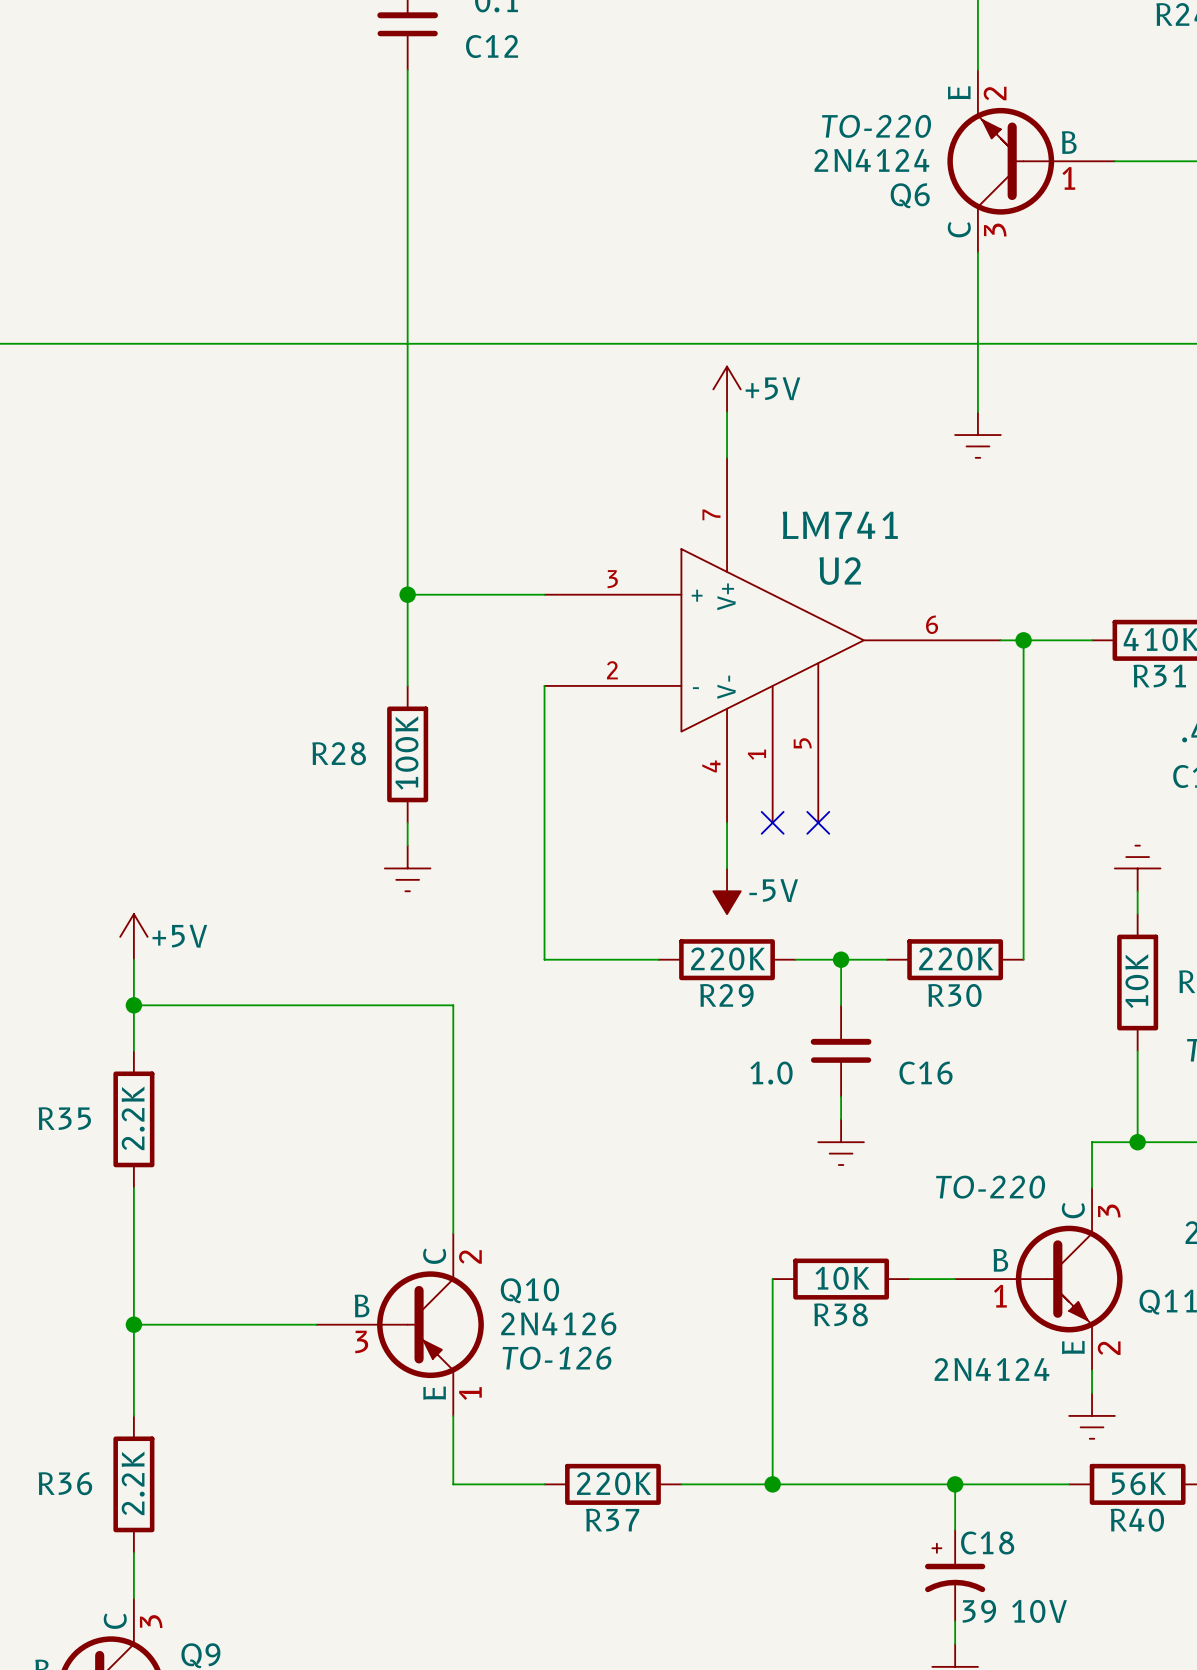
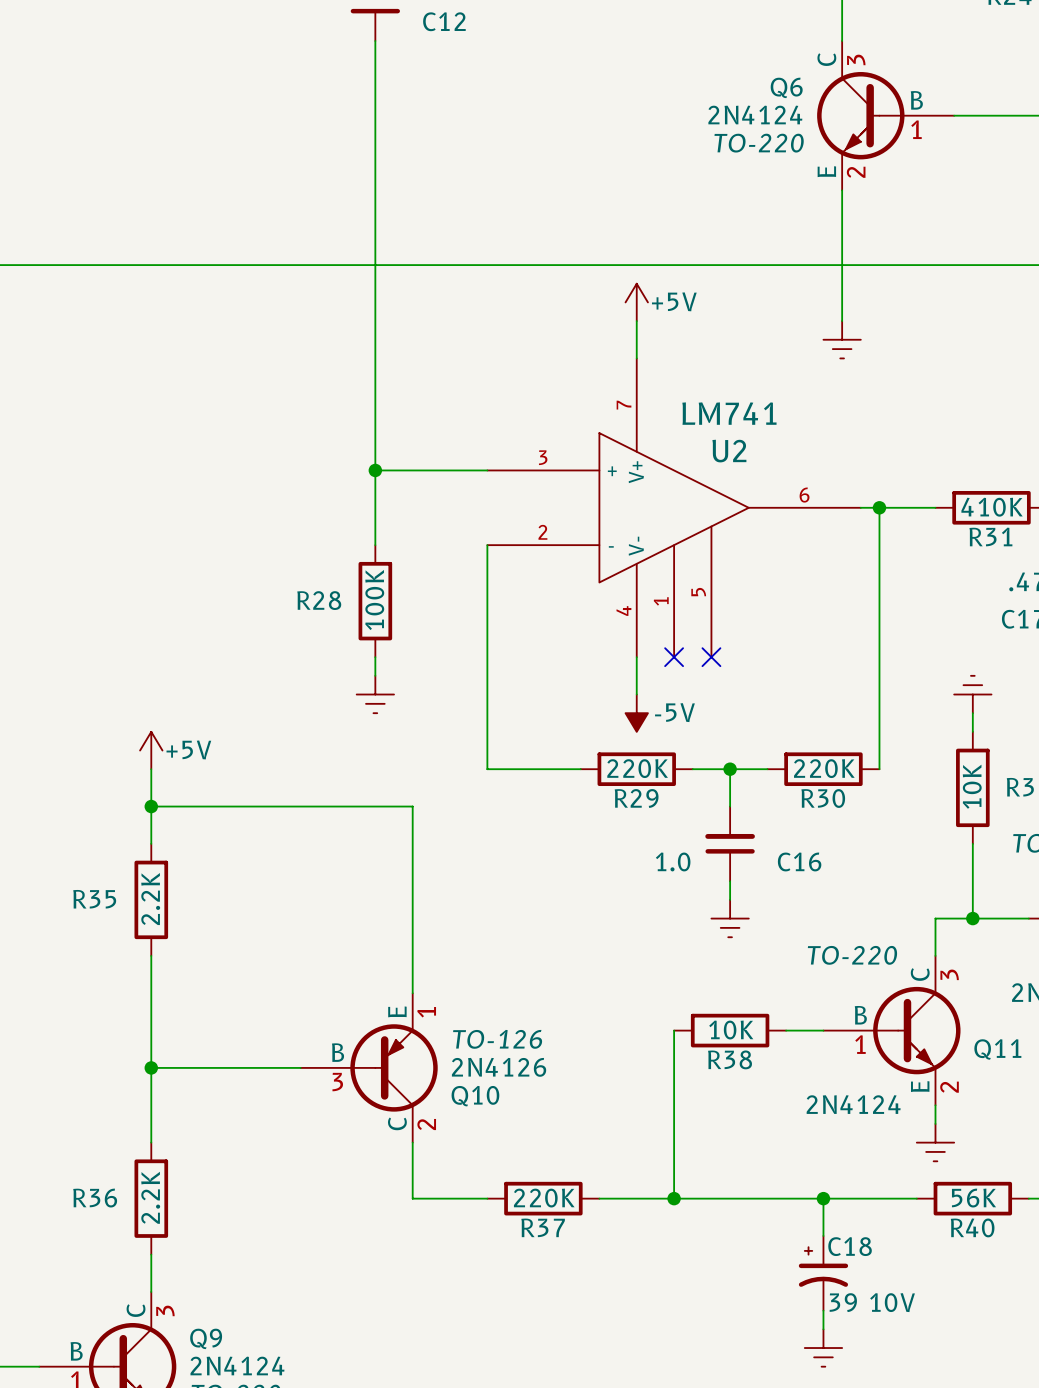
Q6 flip: as is (1000, 161) -> up-down (860, 115)
Q10 flip: as is (430, 1324) -> up-down (394, 1067)

